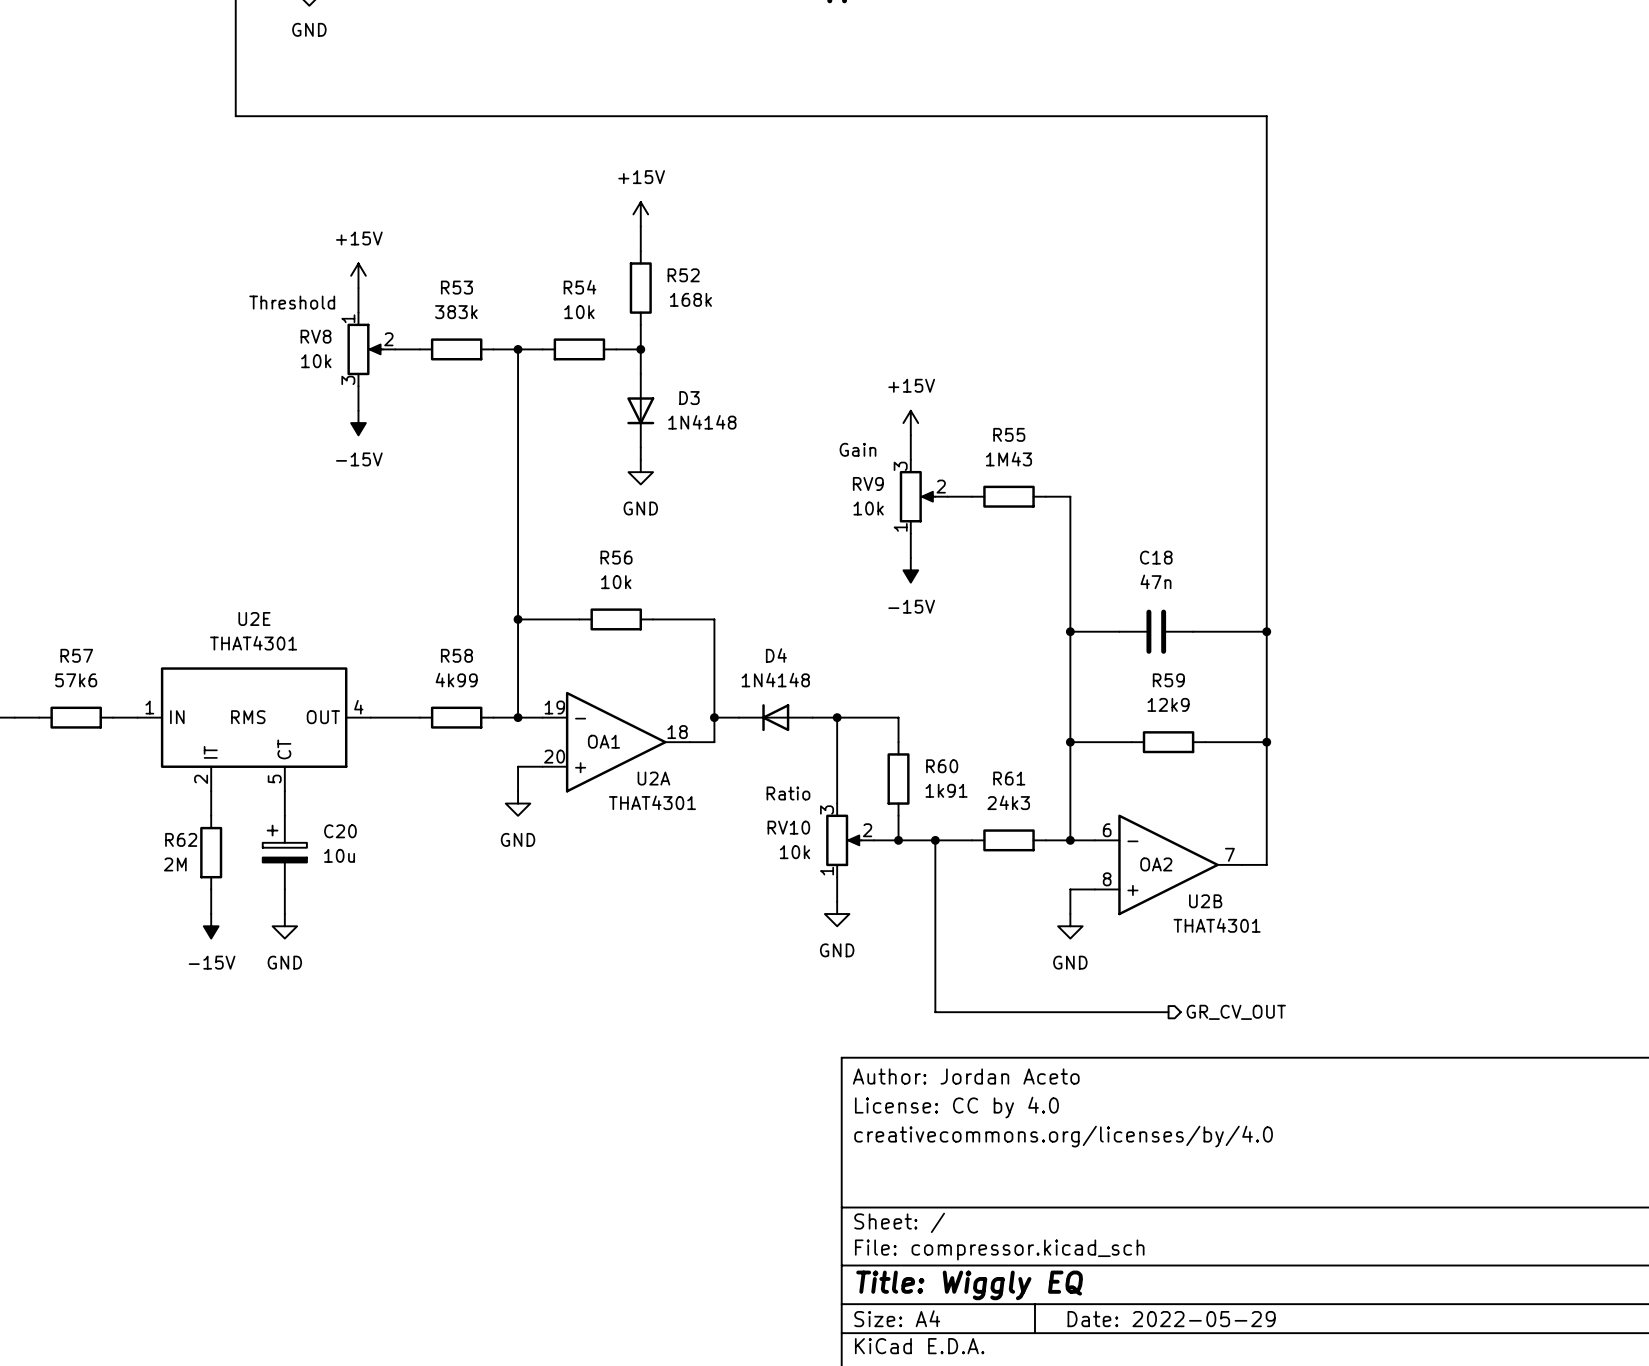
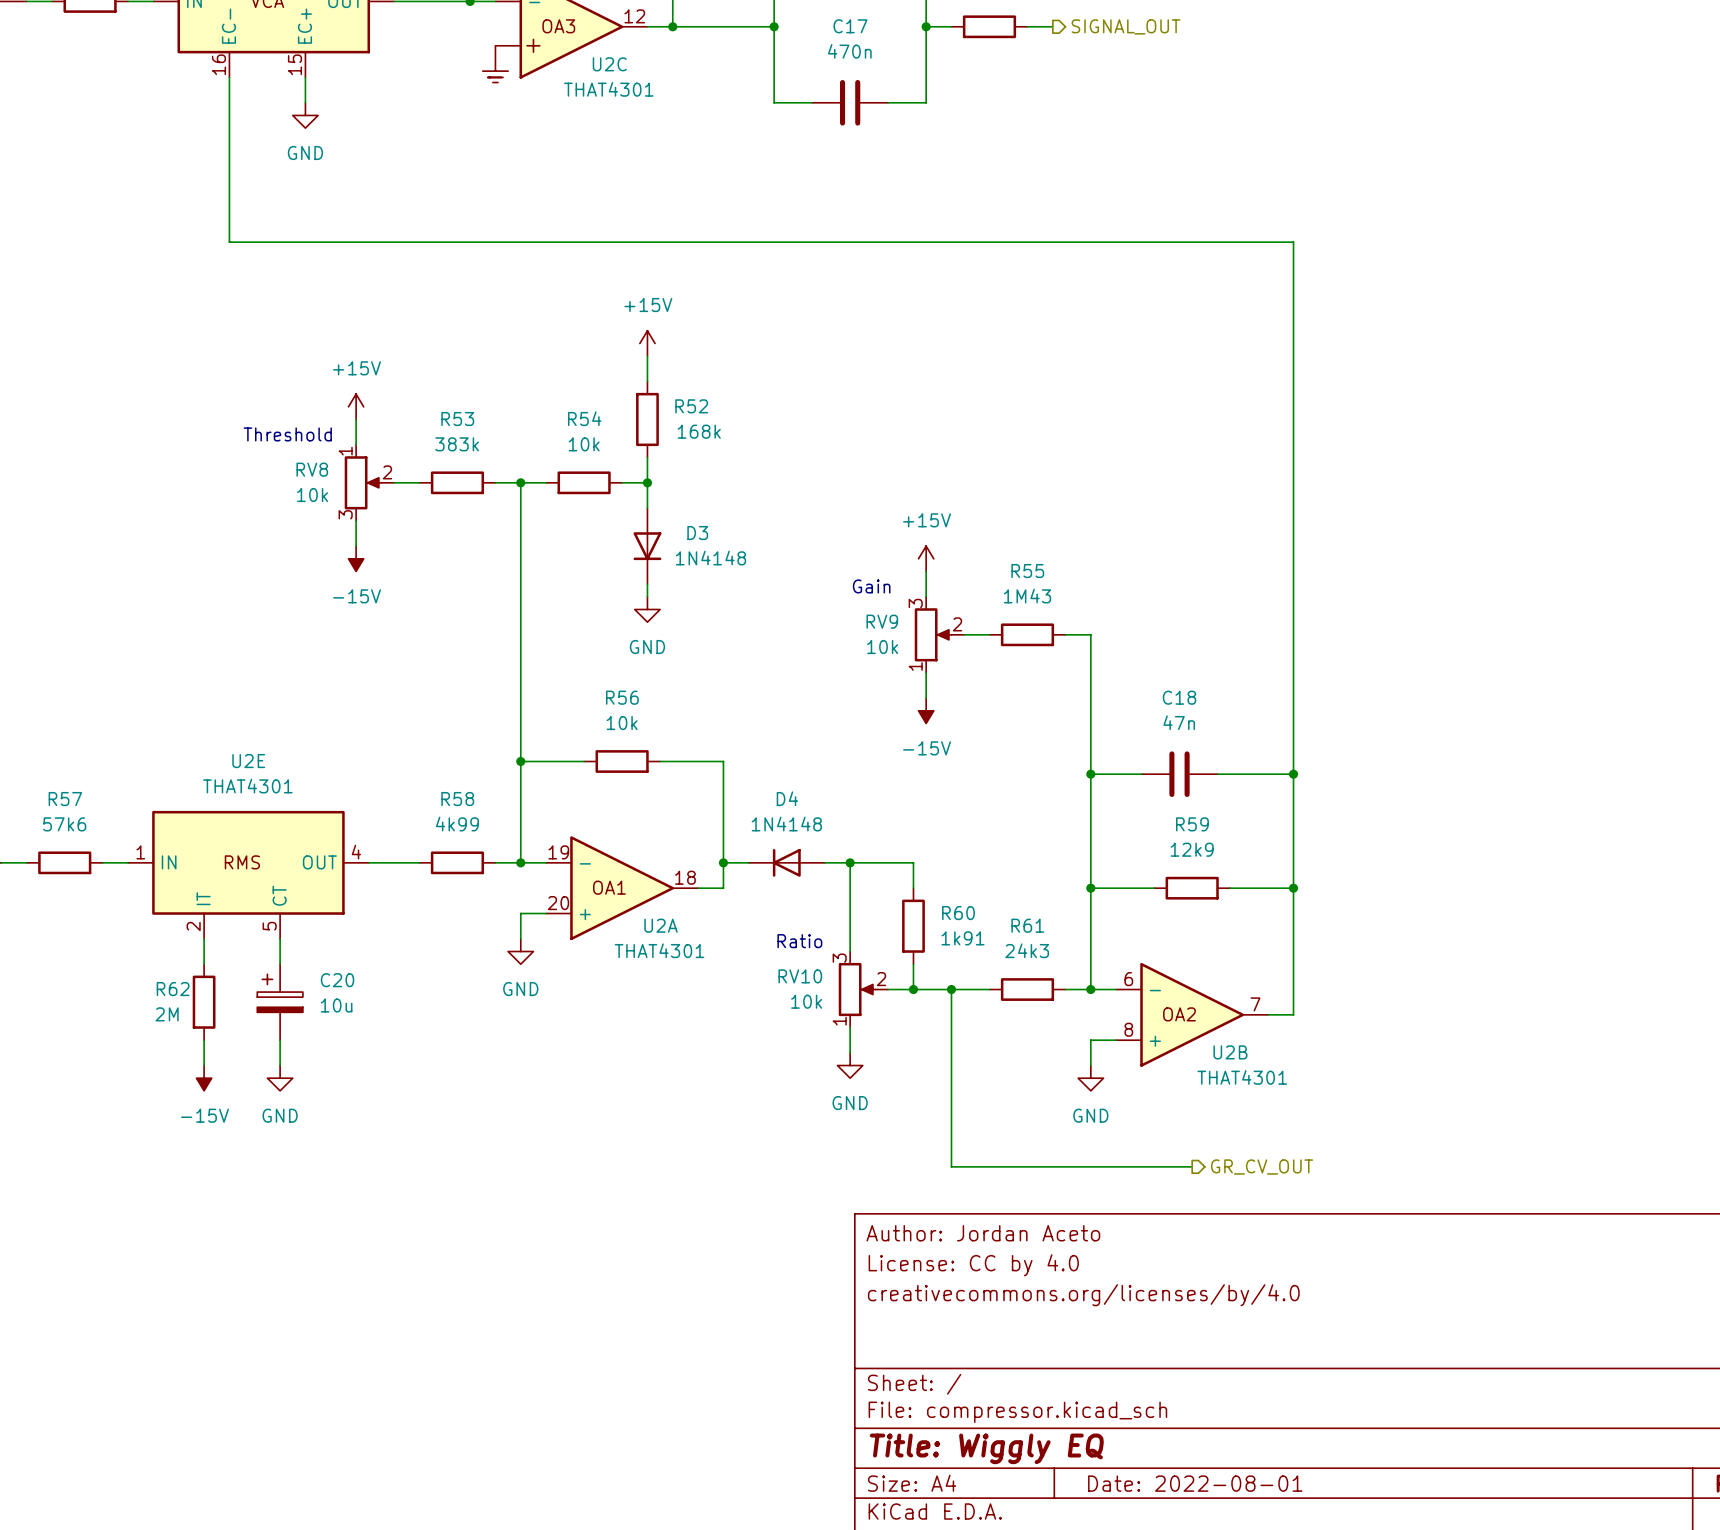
title block: Date: 2022-05-29 (1171, 1319) -> Date: 2022-08-01 (1195, 1483)

